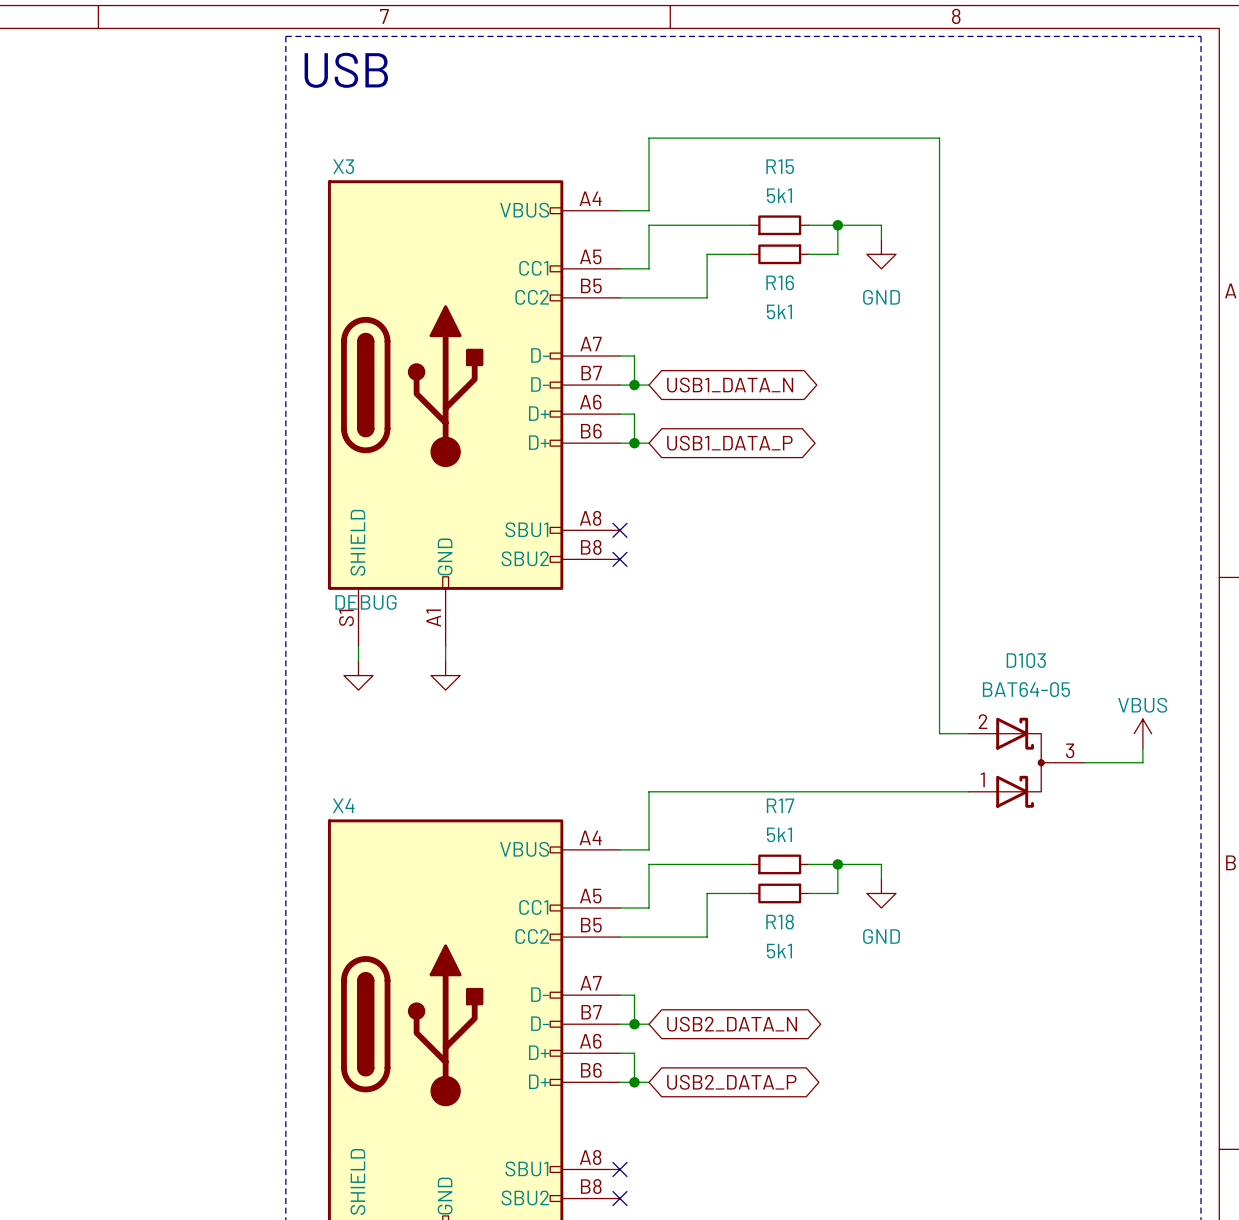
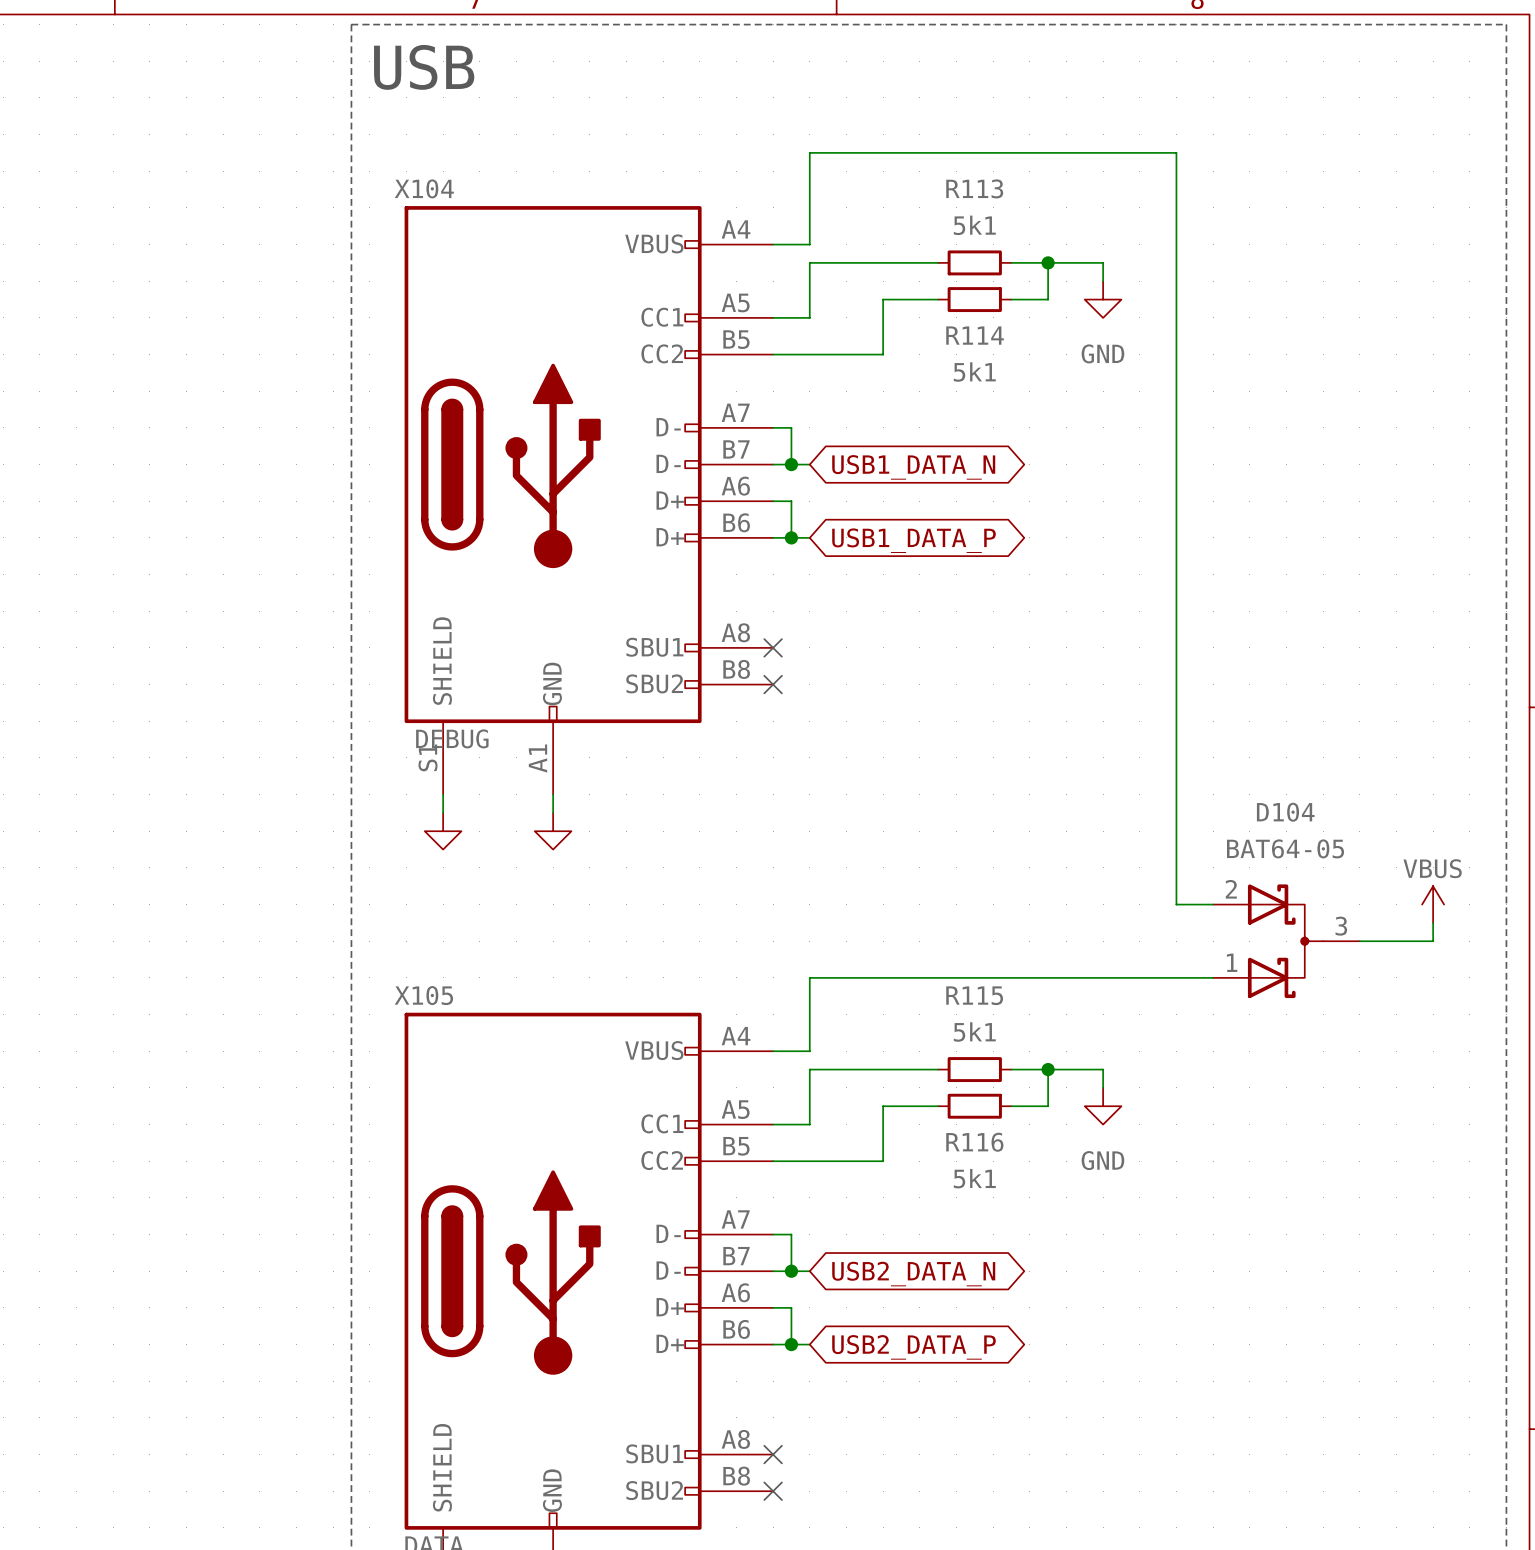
X3 name: X3 (343, 166) -> X104 (424, 188)
R15 name: R15 (780, 166) -> R113 (974, 188)
R16 name: R16 (780, 282) -> R114 (975, 335)
D103 name: D103 (1026, 660) -> D104 (1285, 812)
X4 name: X4 (343, 805) -> X105 (423, 995)
R17 name: R17 (780, 805) -> R115 (974, 995)
R18 name: R18 (780, 921) -> R116 (974, 1142)

